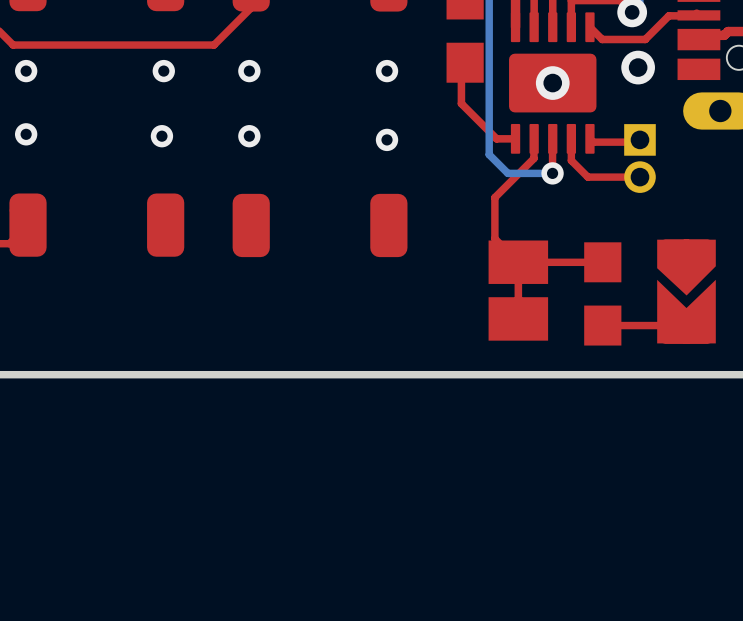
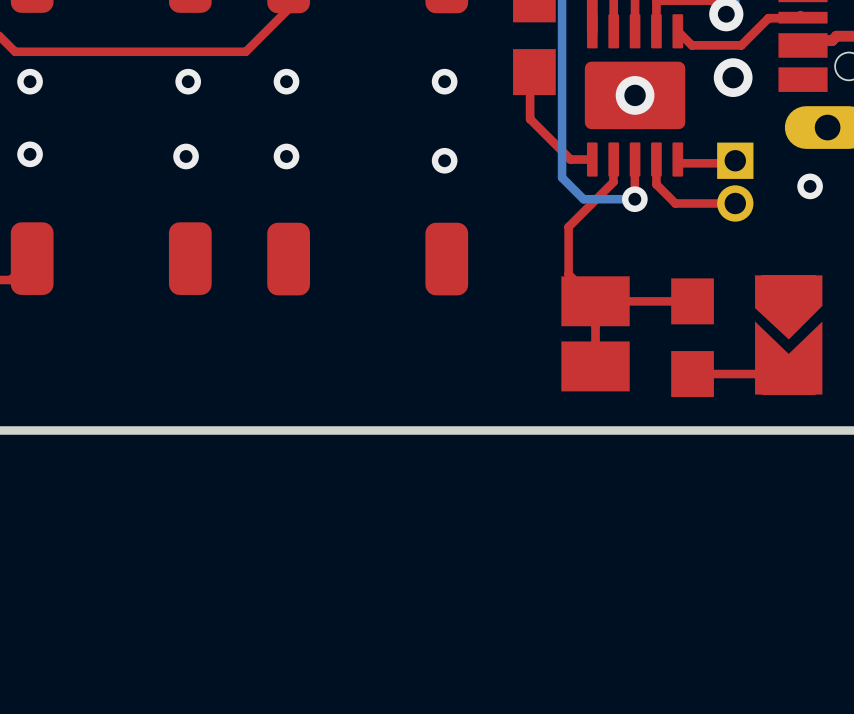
via: none -> (810, 186)

